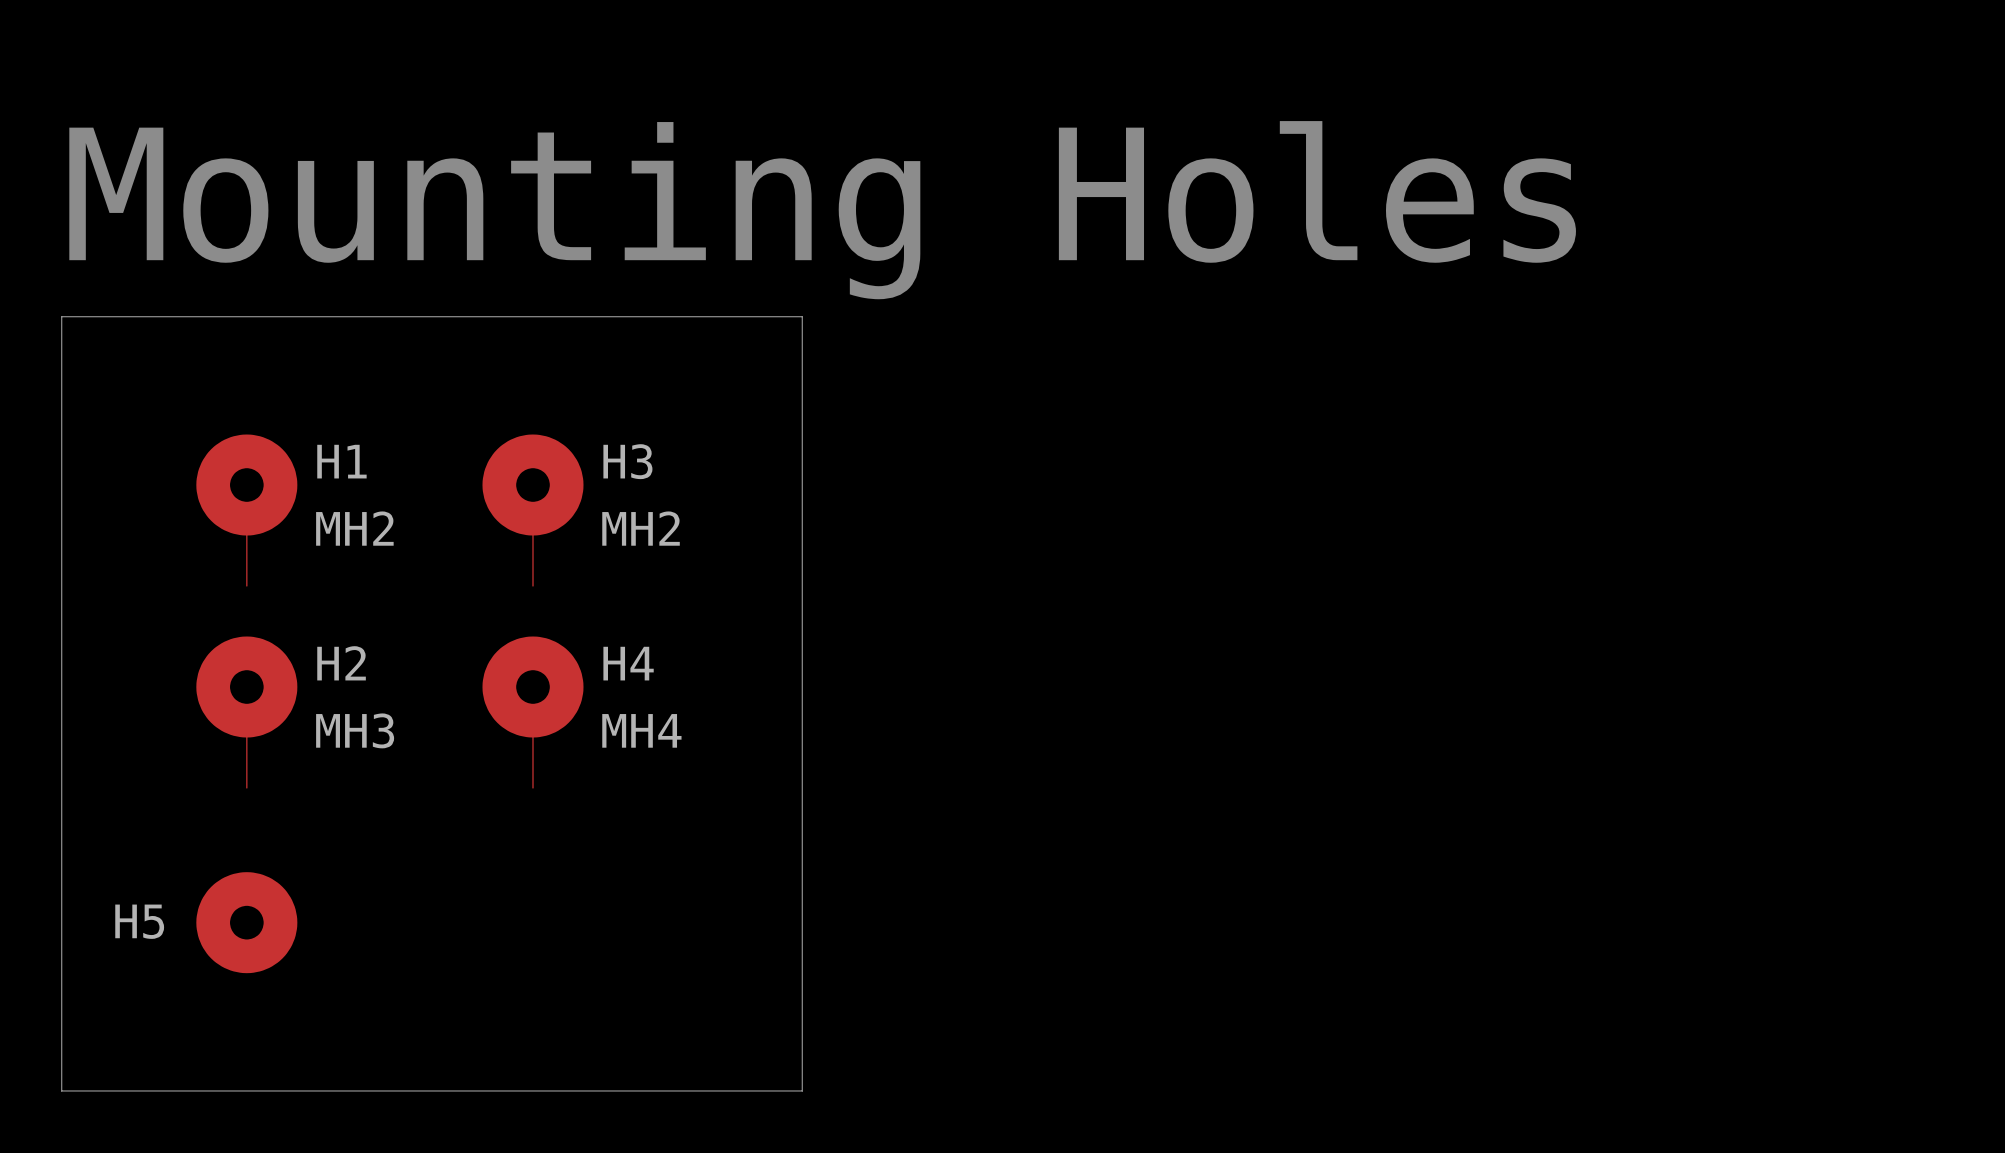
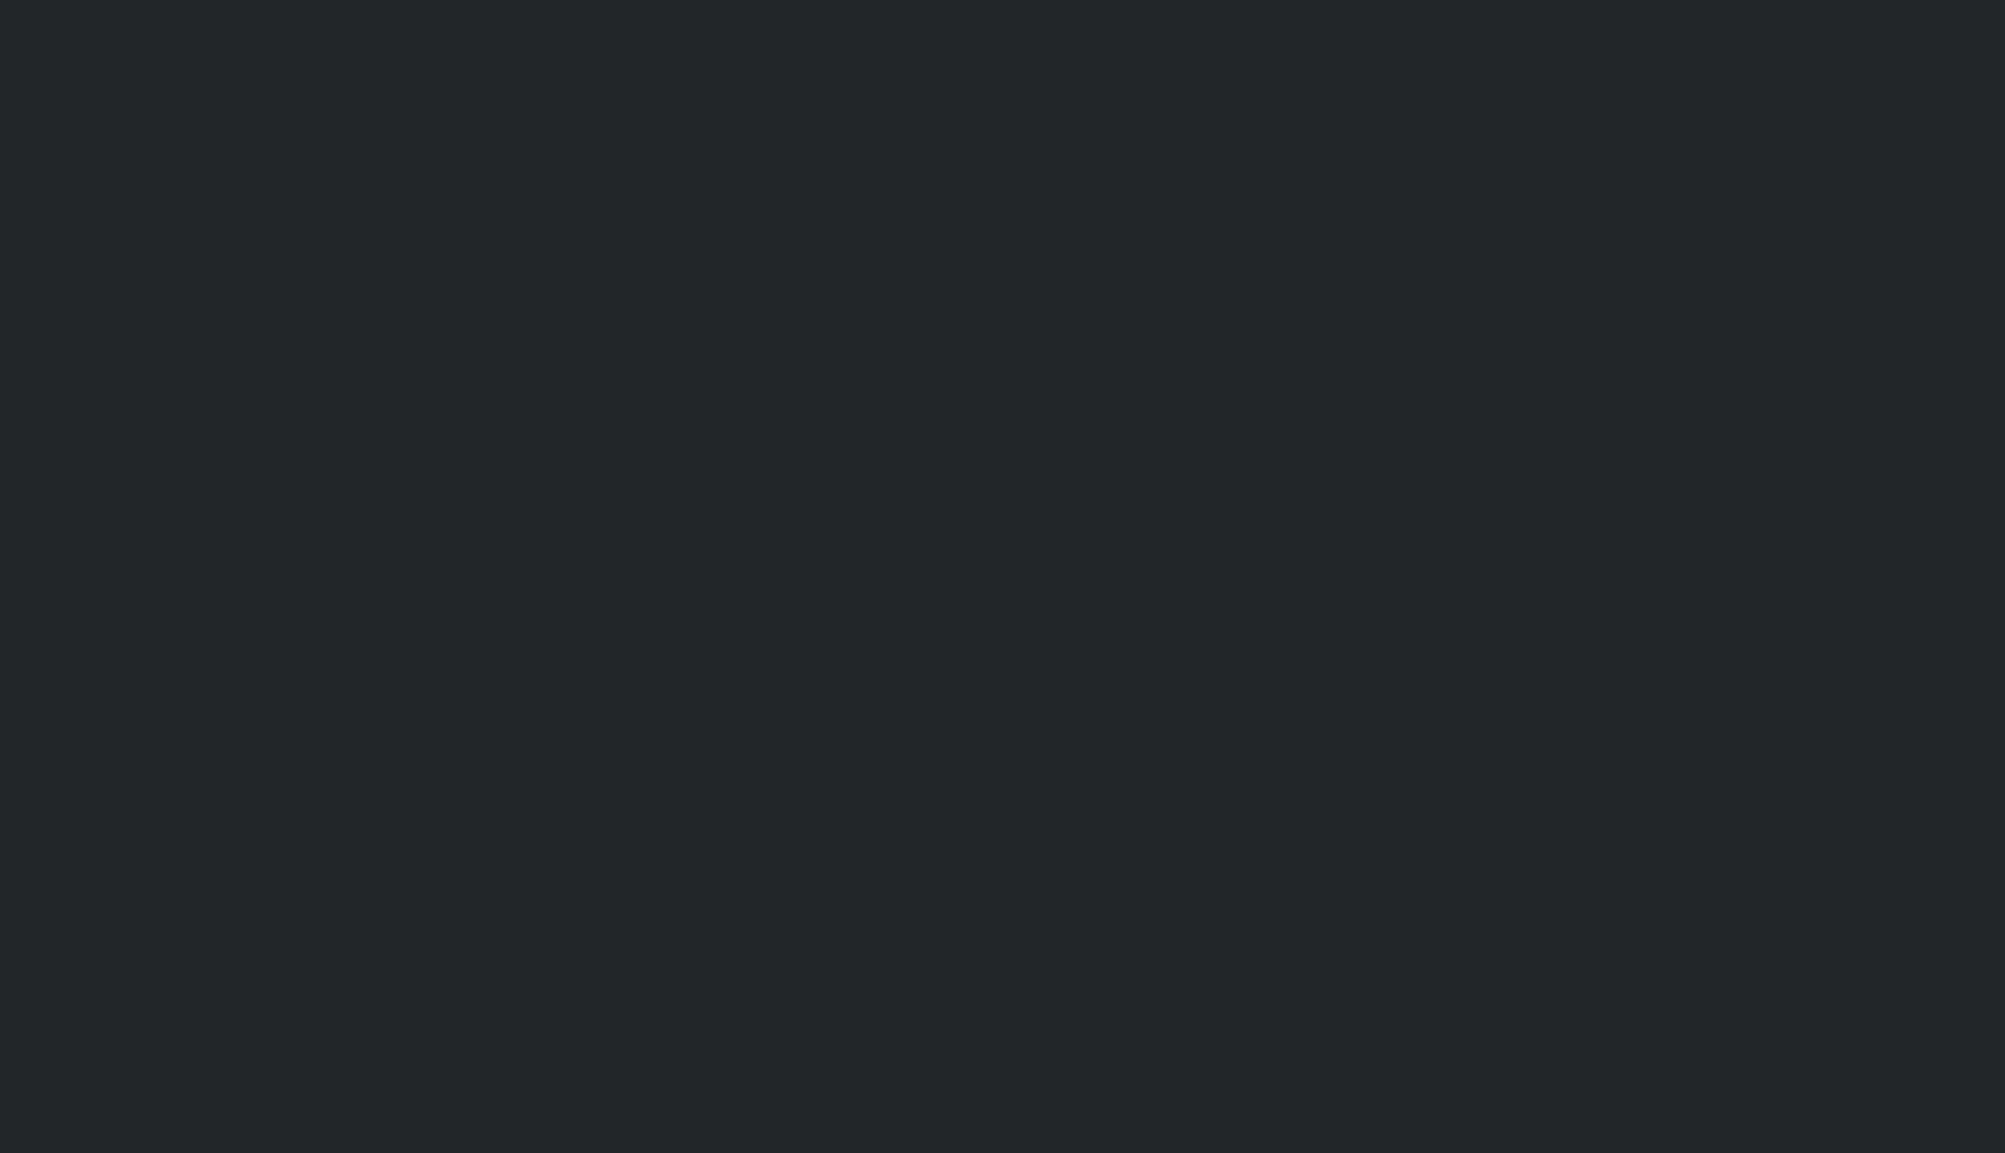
text: Mounting Holes (822, 210) -> none
line: (61, 316) (802, 316) (802, 1090) (61, 1090) (61, 316) -> none
H1: MH2 (246, 510) -> none
H3: MH2 (532, 510) -> none
H2: MH3 (246, 712) -> none
H4: MH4 (532, 712) -> none
H5: (246, 922) -> none

